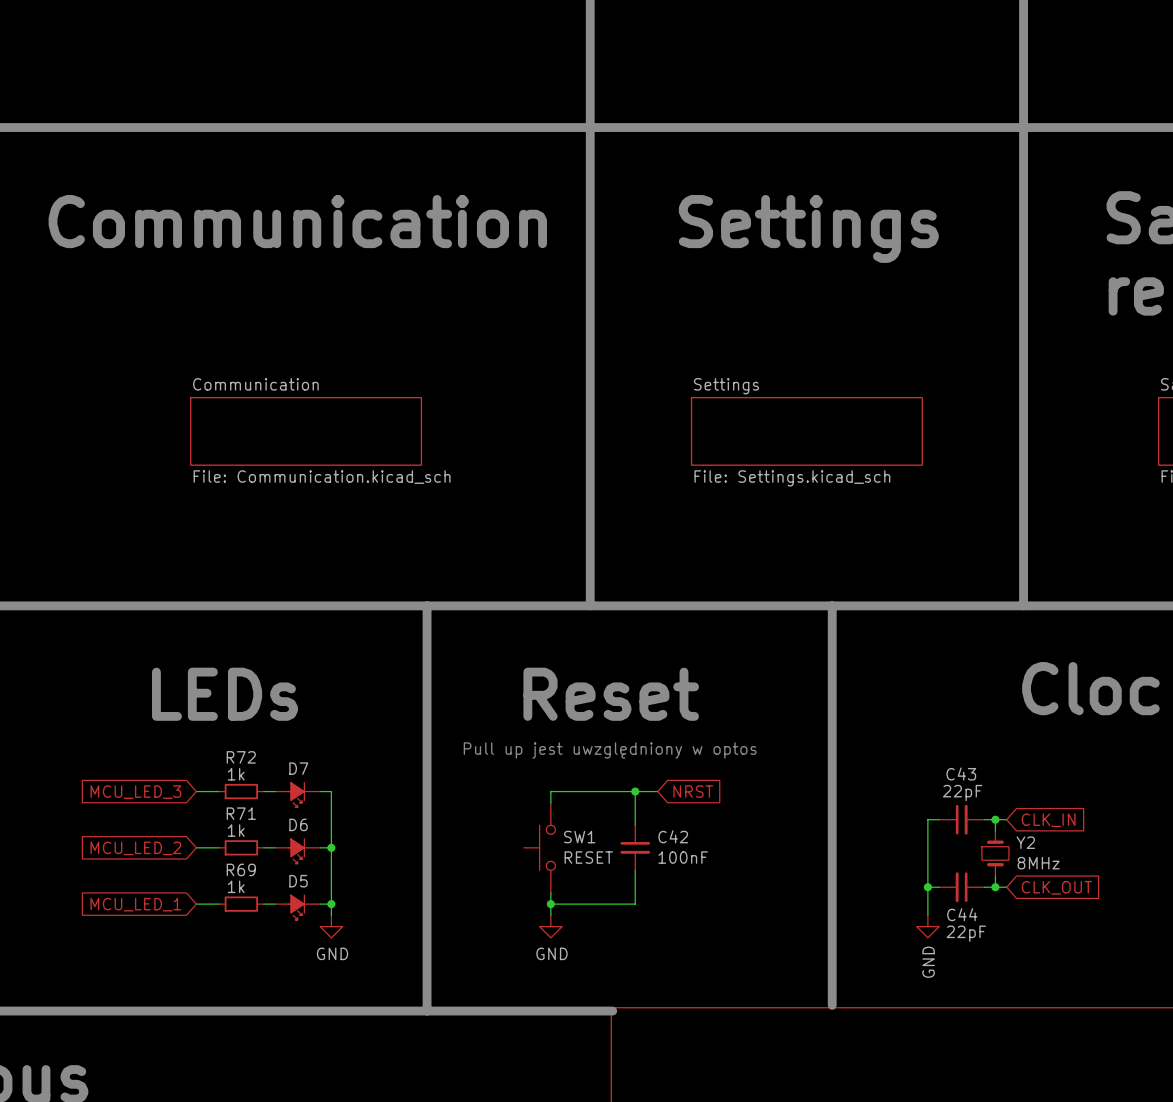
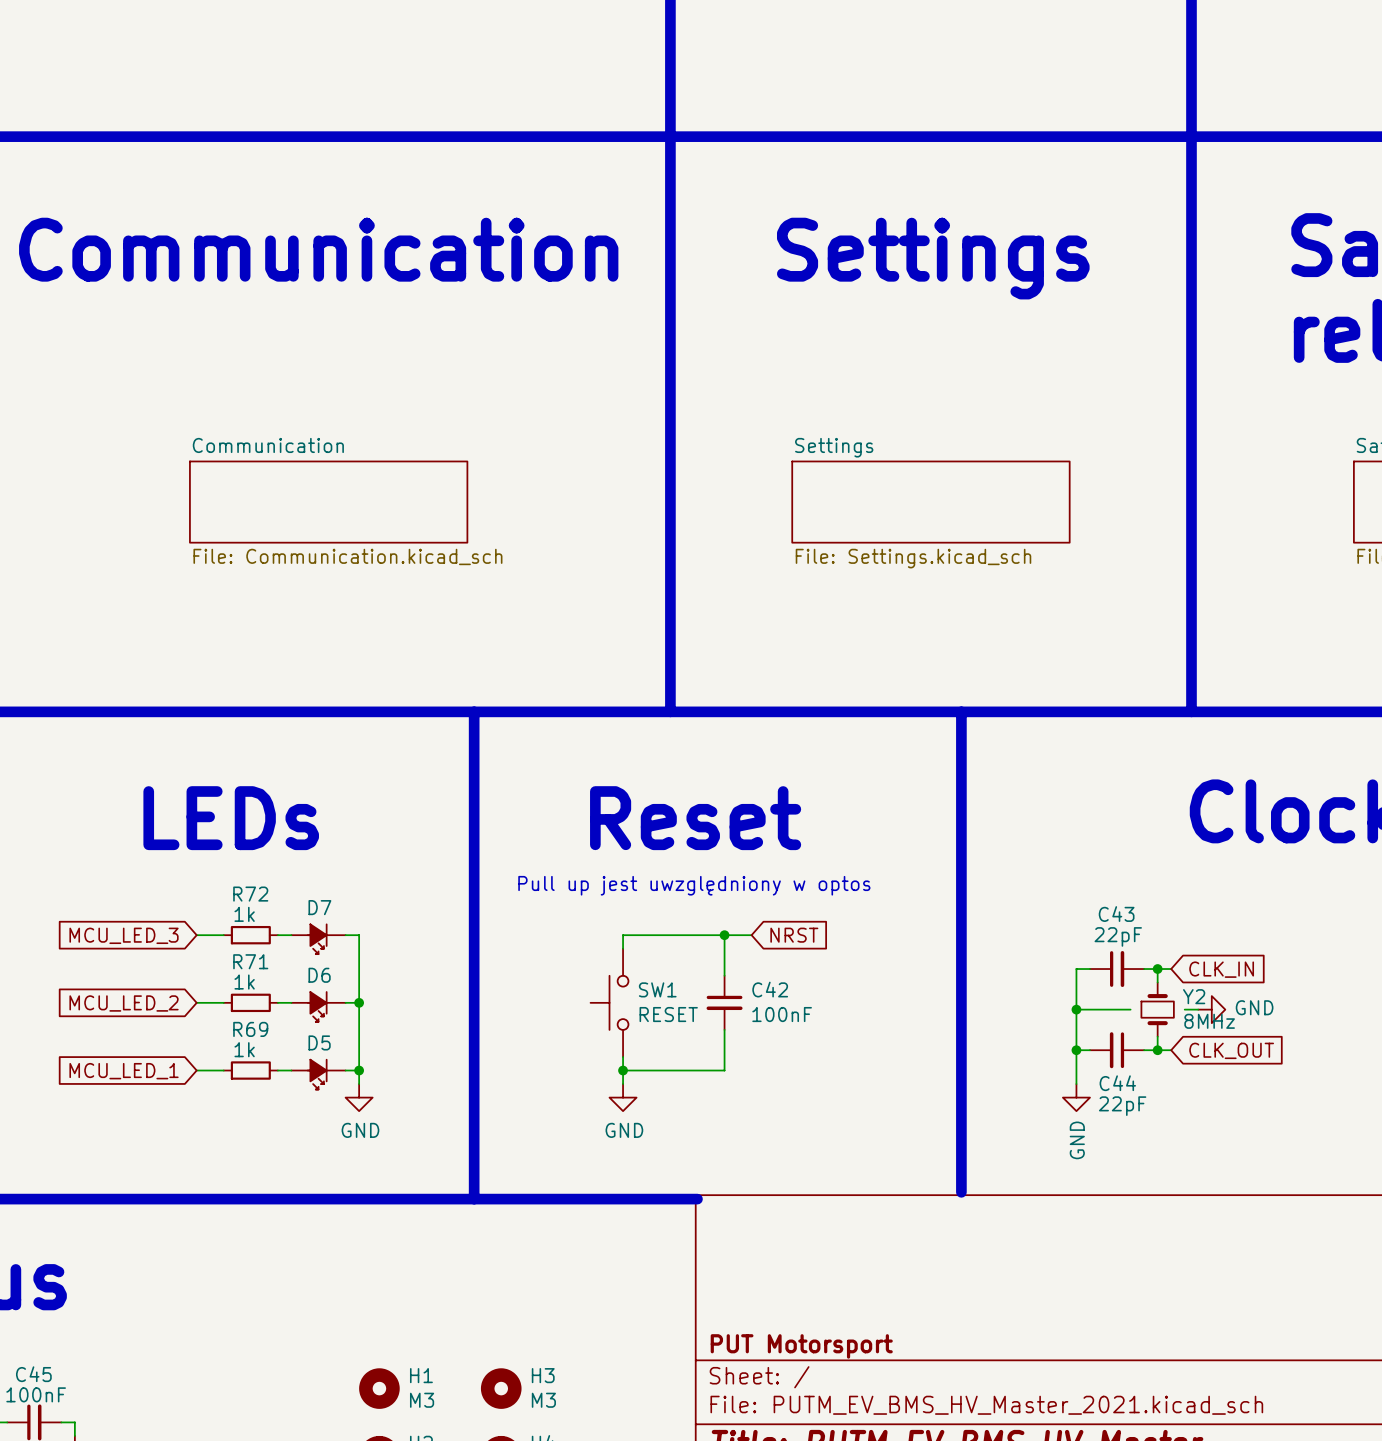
wire: none -> (1076, 1009) (1130, 1009)
junction: none -> (1076, 1009)
wire: none -> (1184, 1009) (1198, 1009)
power symbol: none -> GND (1211, 1009)

